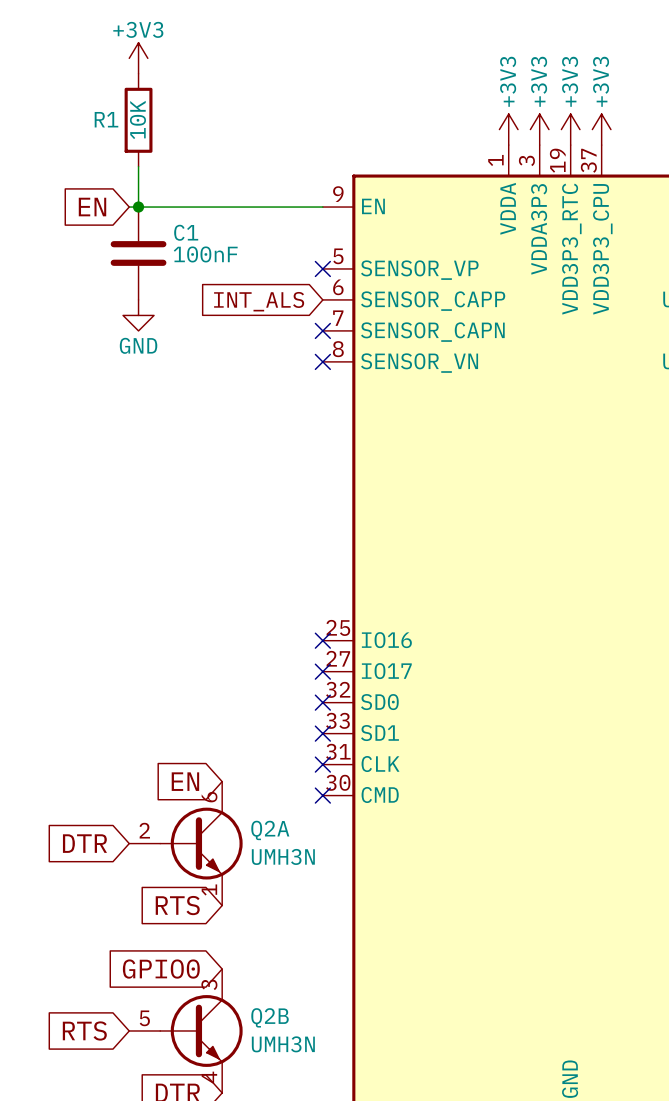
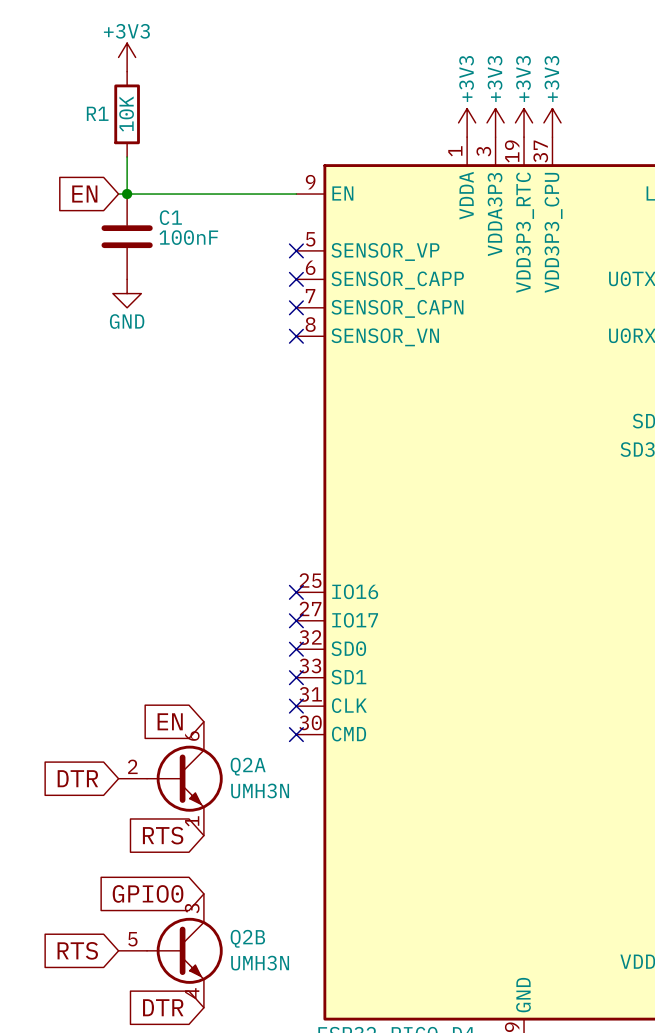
no-connect mark: none -> (296, 279)
global label: INT_ALS (259, 301) -> none

